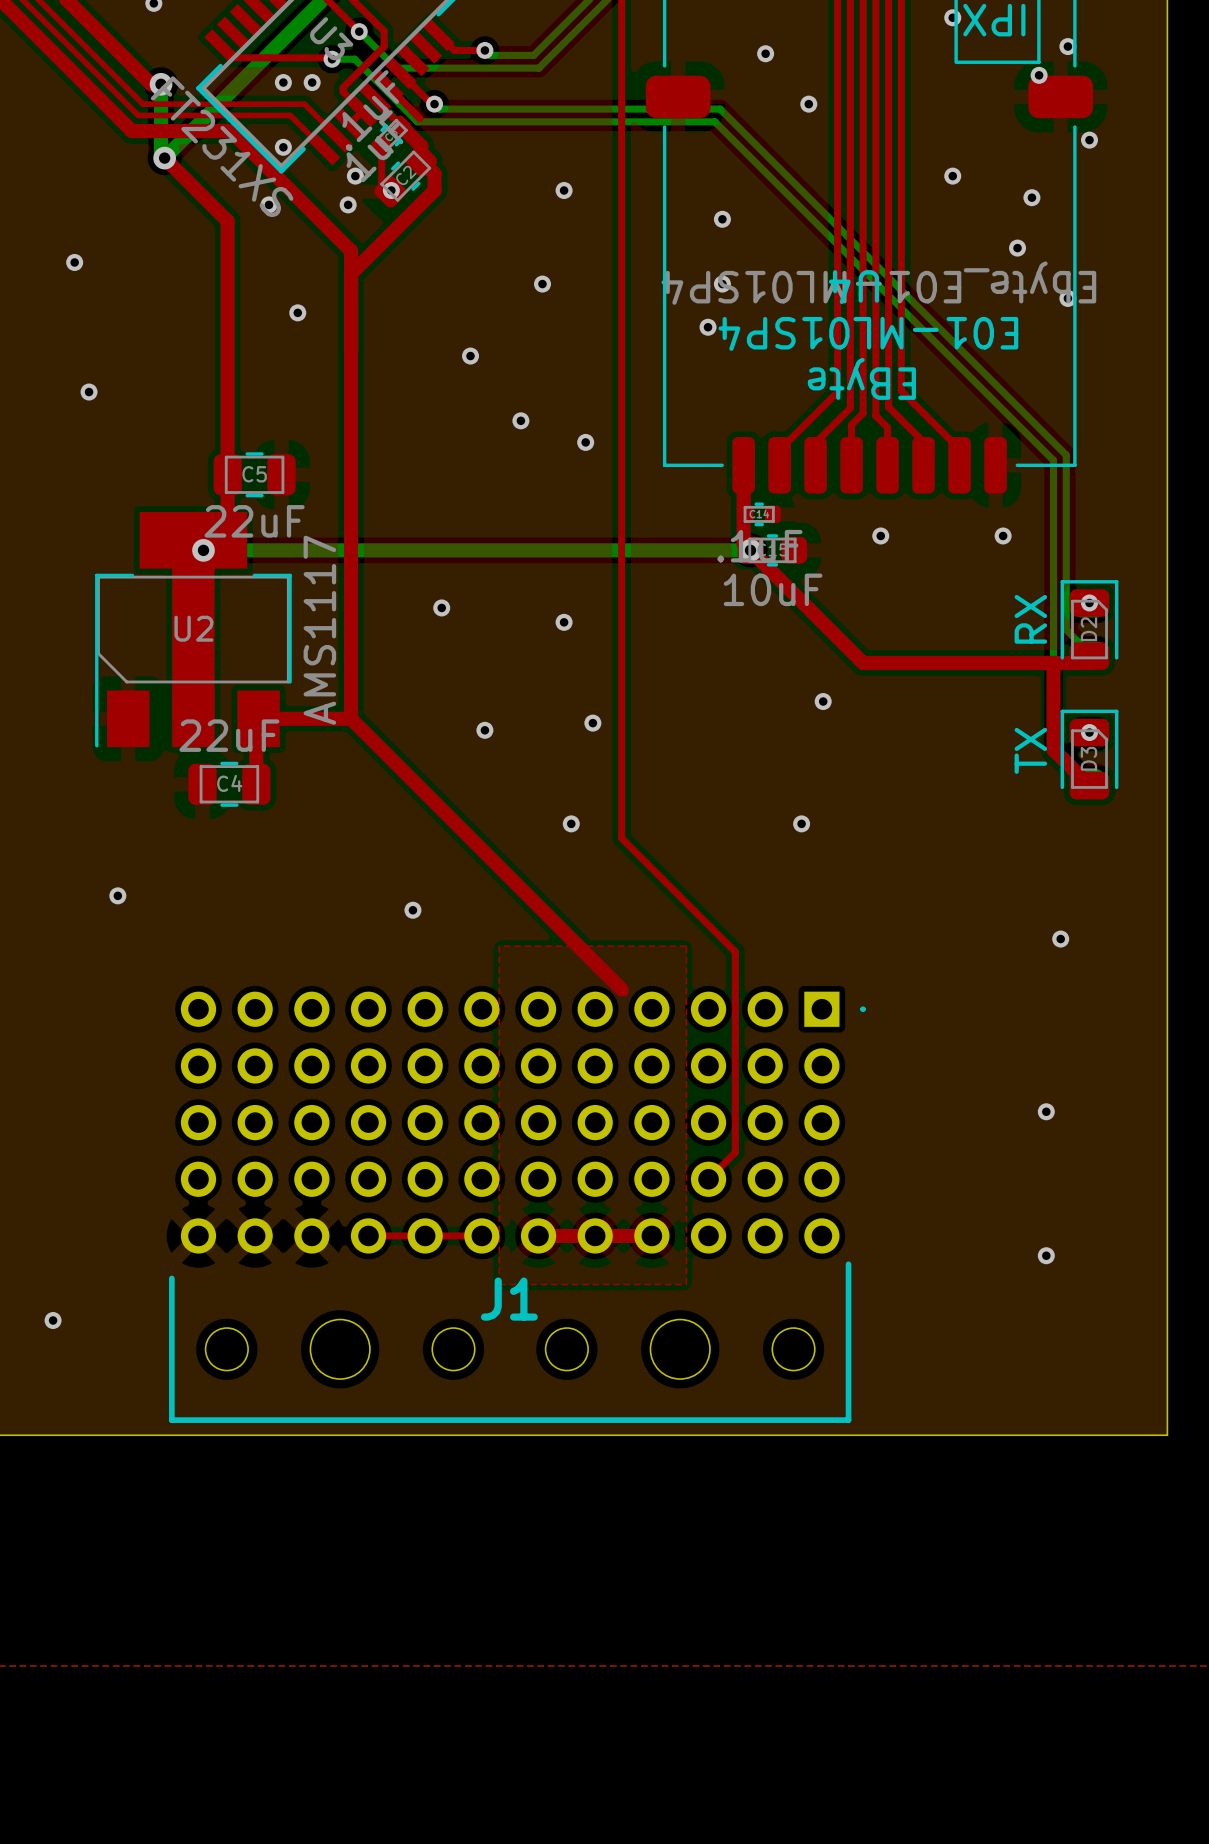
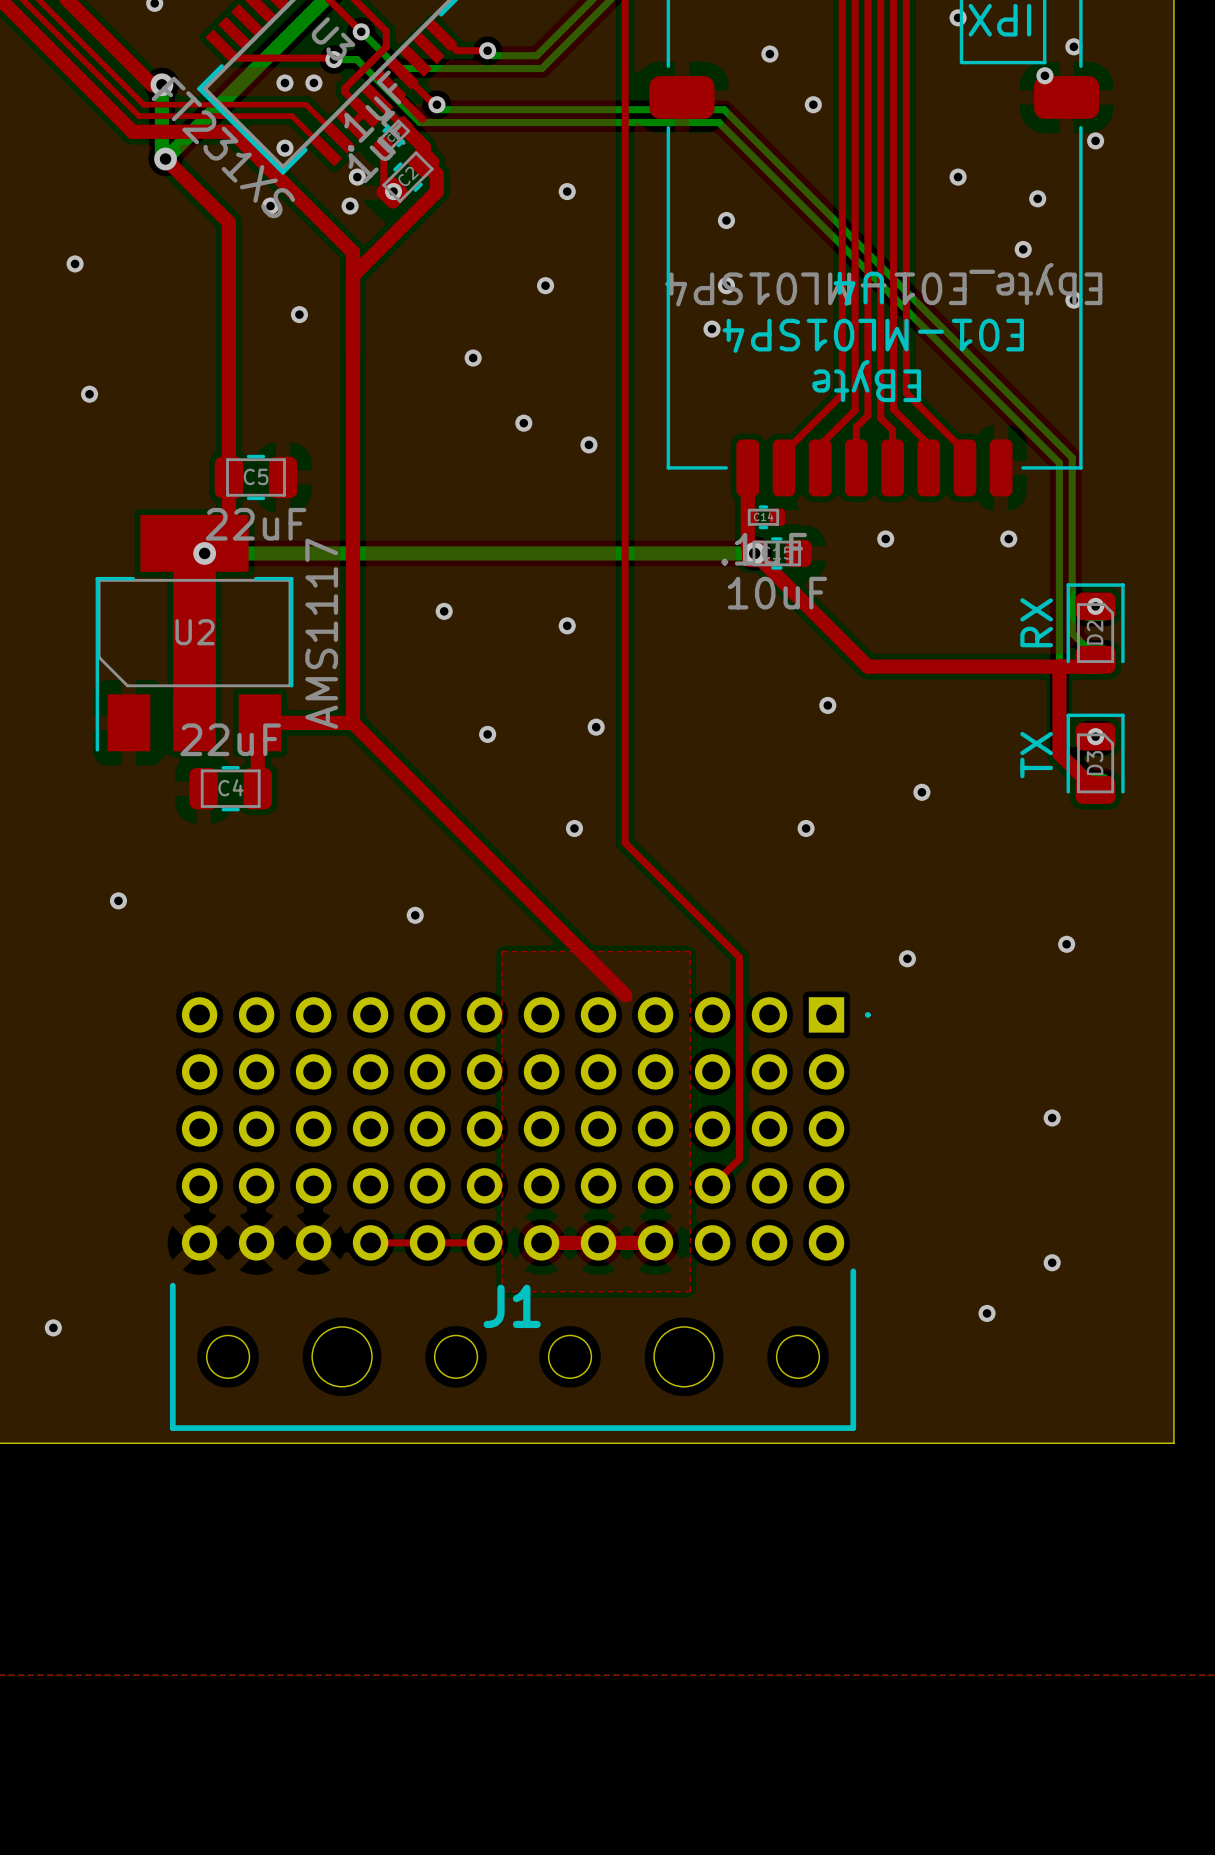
via: none -> (921, 792)
via: none -> (907, 958)
via: none -> (987, 1313)

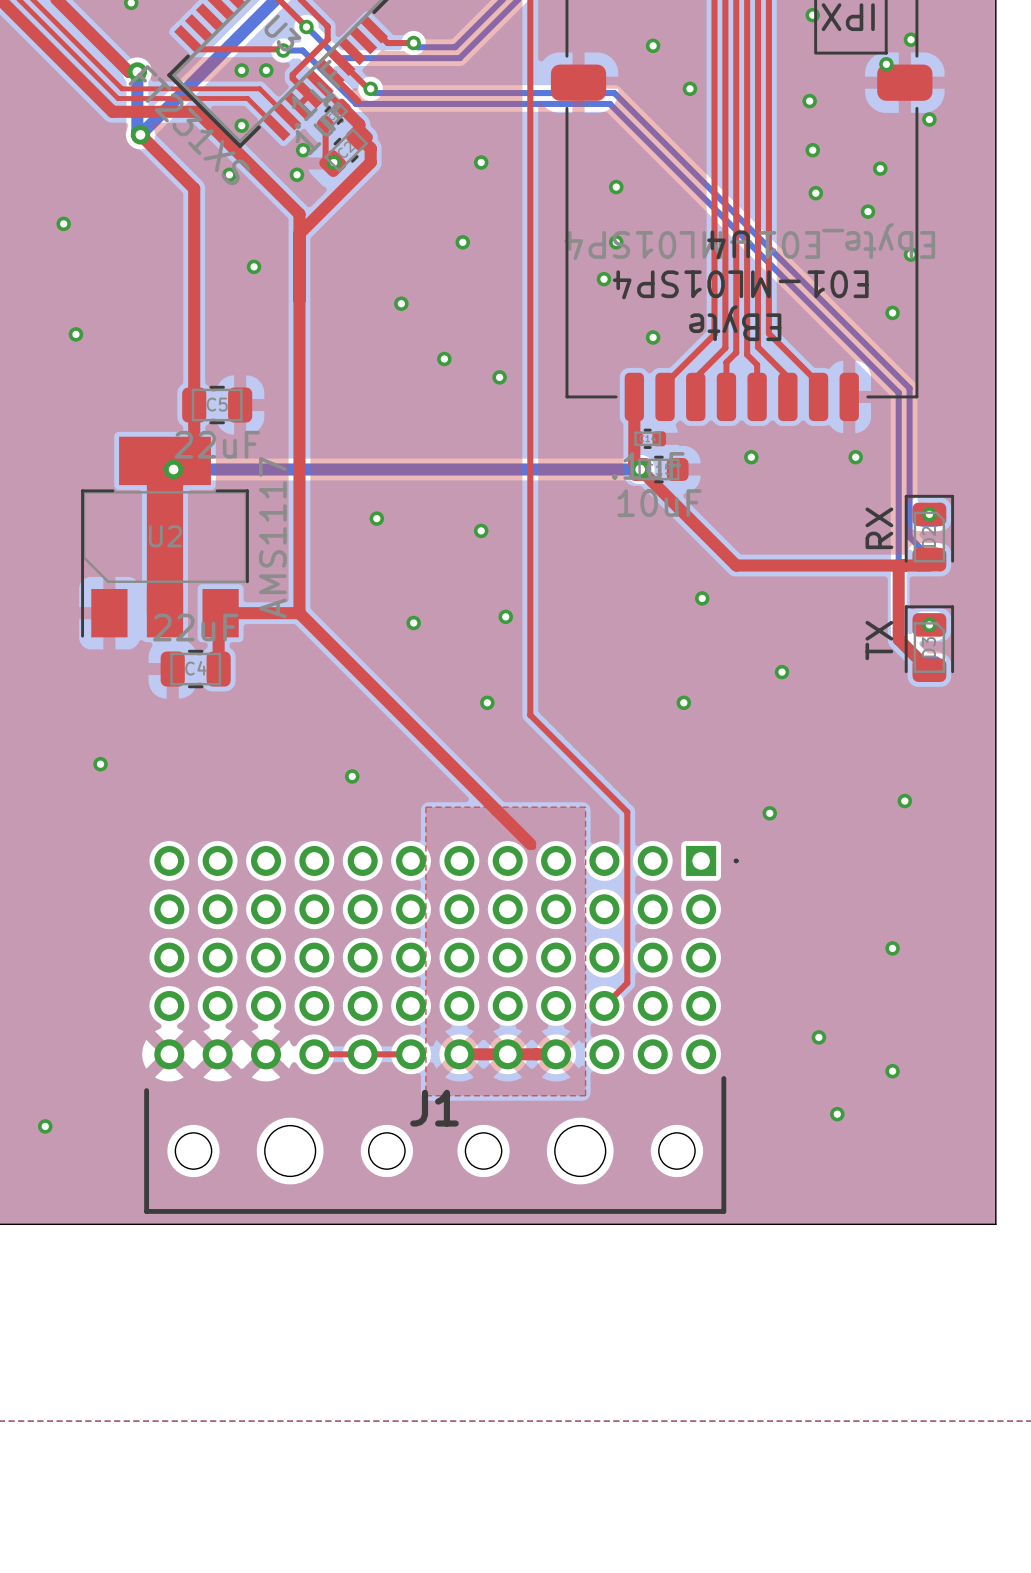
via: none -> (809, 101)
via: none -> (815, 193)
via: none -> (892, 312)
via: none -> (653, 337)
via: none -> (818, 1037)

